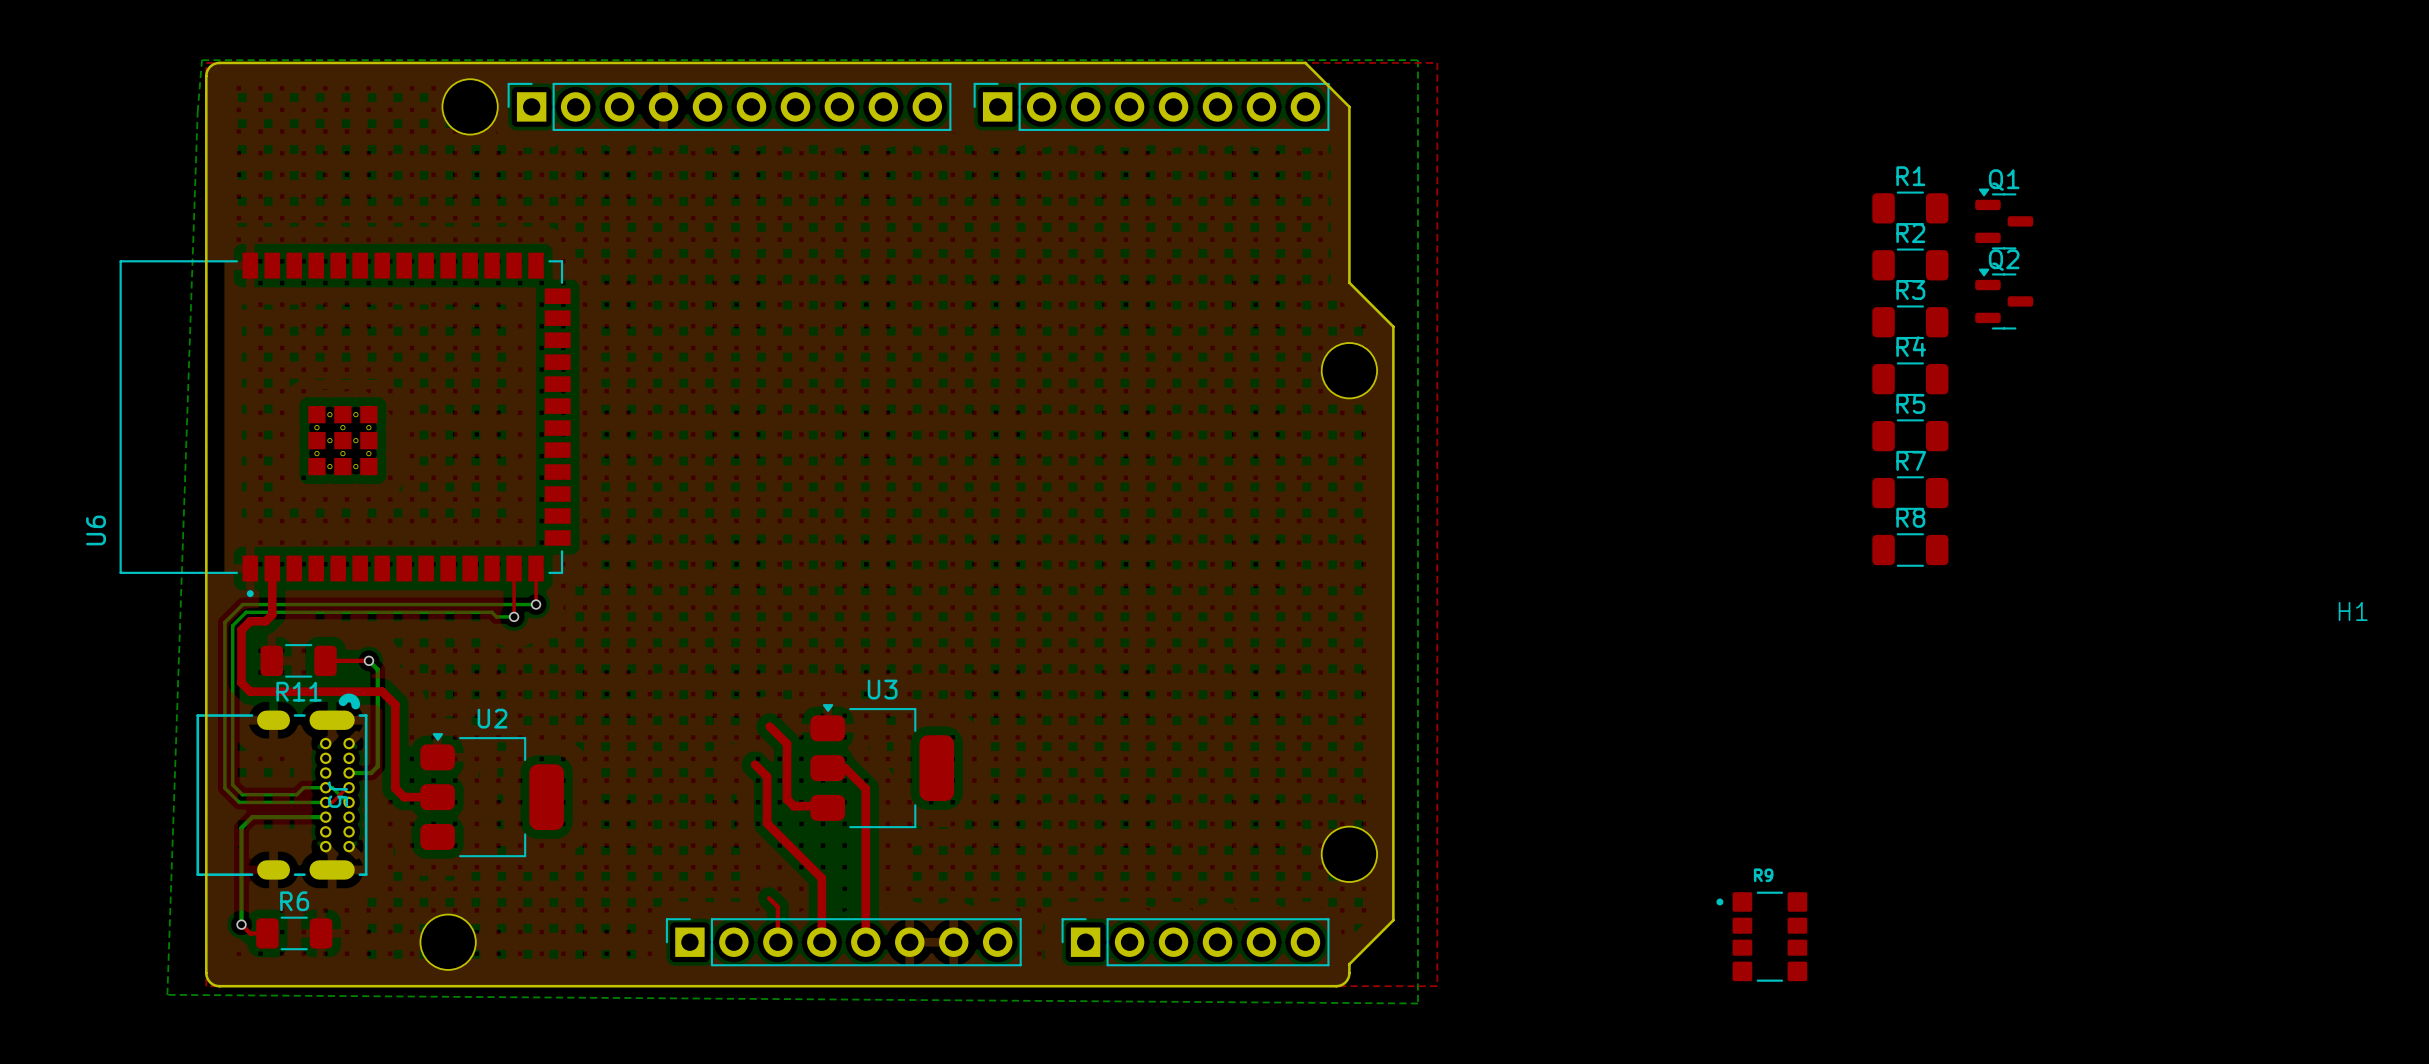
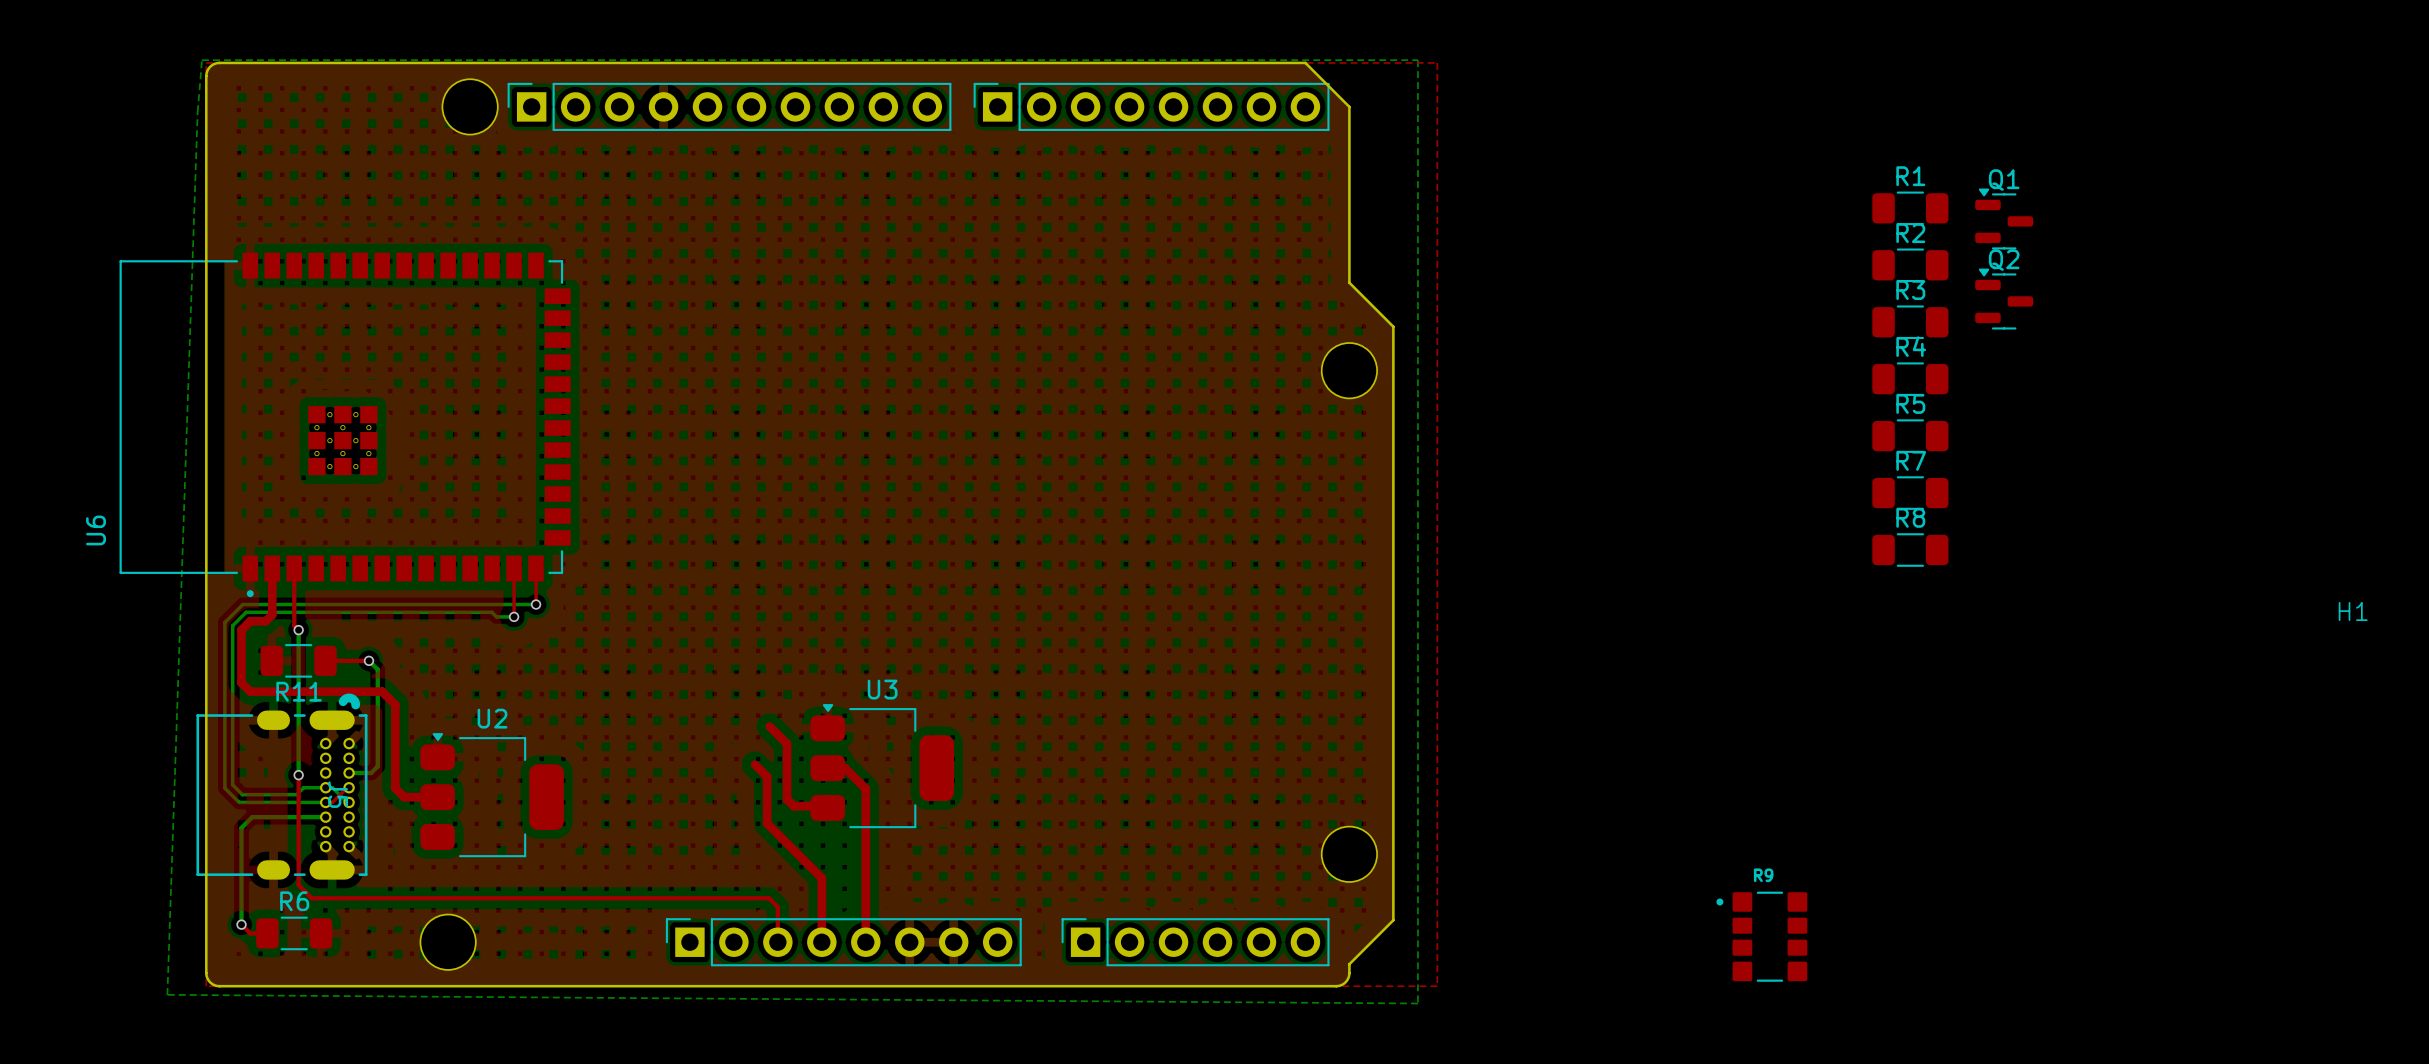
top track: none -> (294, 568) (294, 625) (298, 630)
bottom track: none -> (298, 630) (298, 775)
via: none -> (298, 630)
top track: none -> (298, 775) (298, 885) (311, 898) (769, 898)
via: none -> (298, 775)

